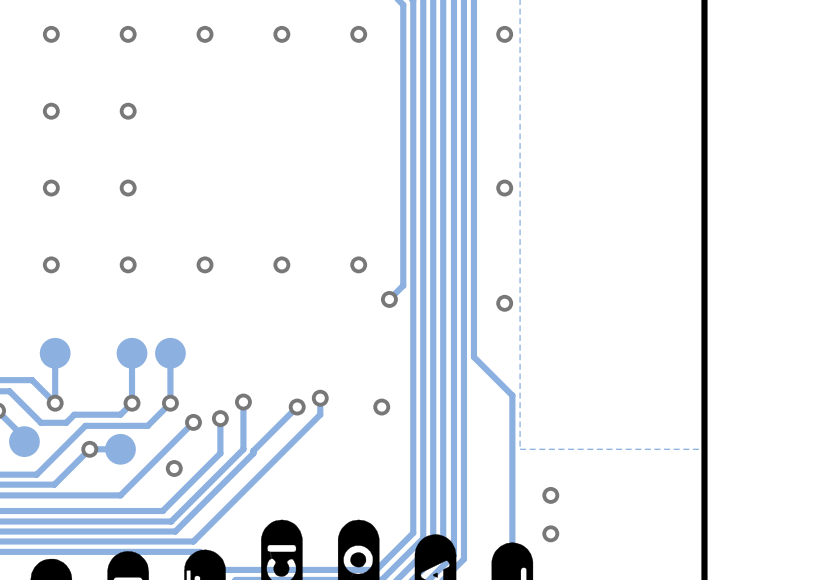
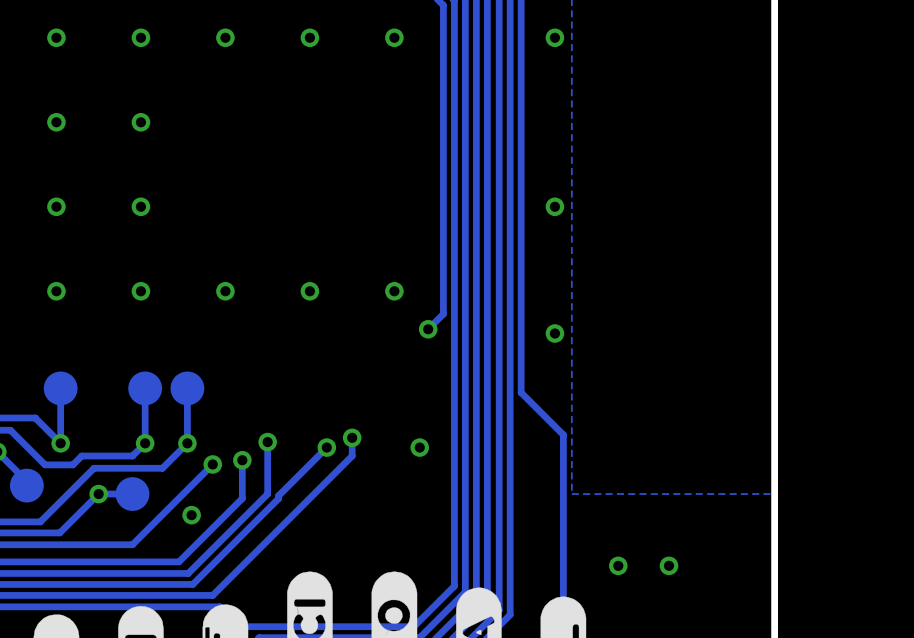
via: (550, 495) -> none
via: none -> (618, 565)
via: none -> (669, 565)
via: (550, 533) -> none

